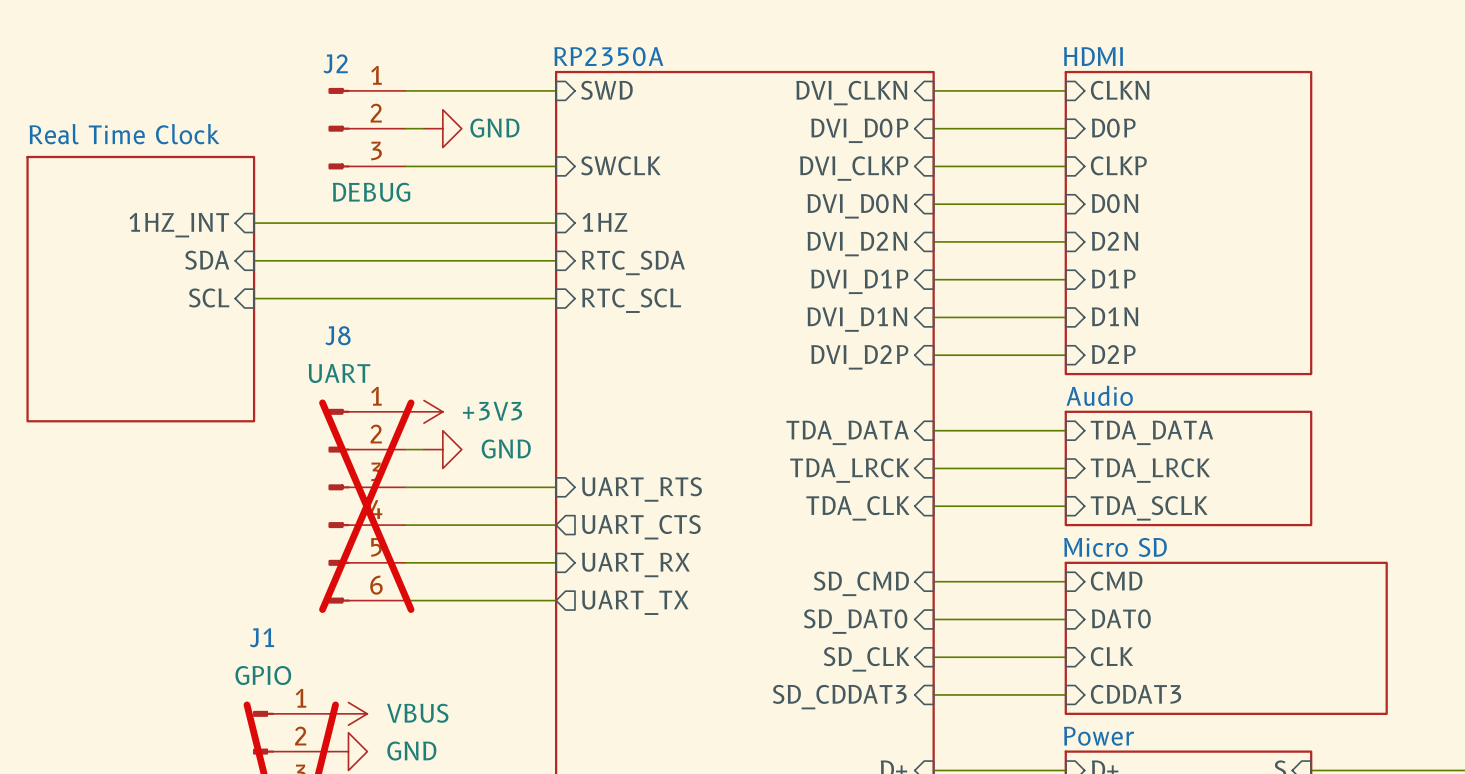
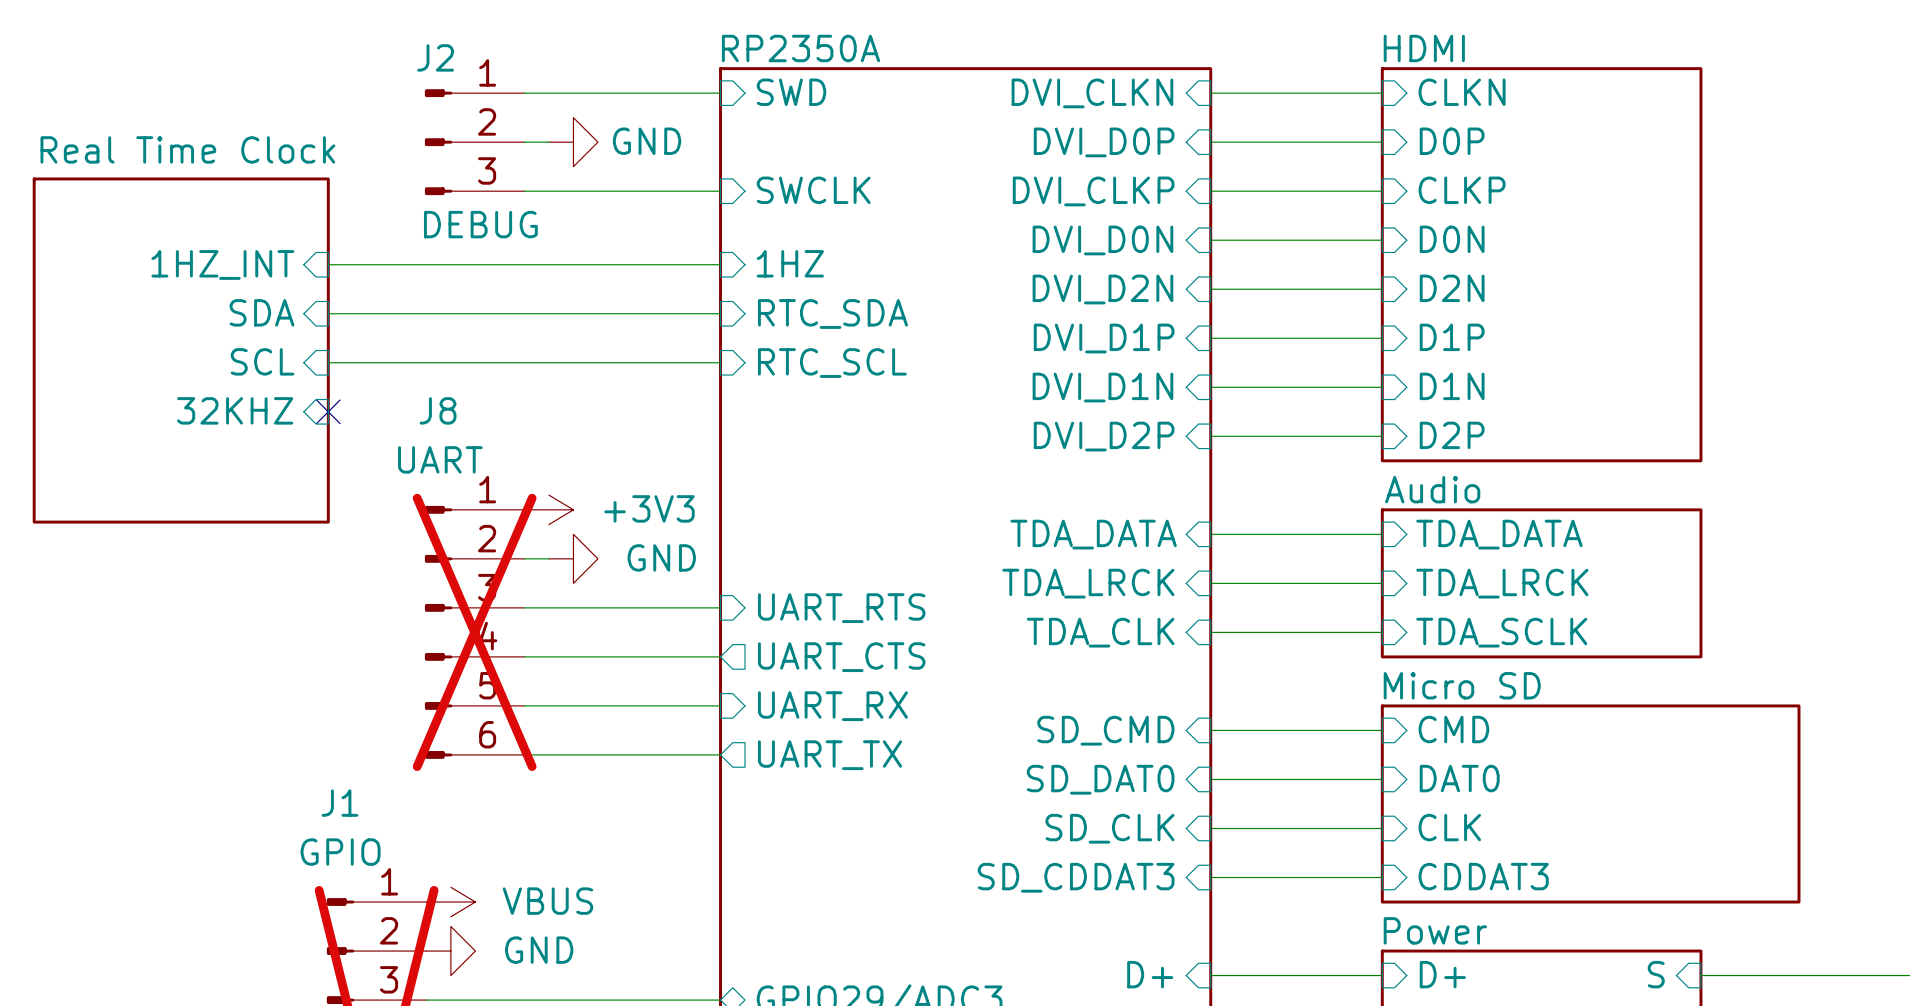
sheet pin: none -> 32KHZ (235, 410)
no-connect mark: none -> (328, 411)

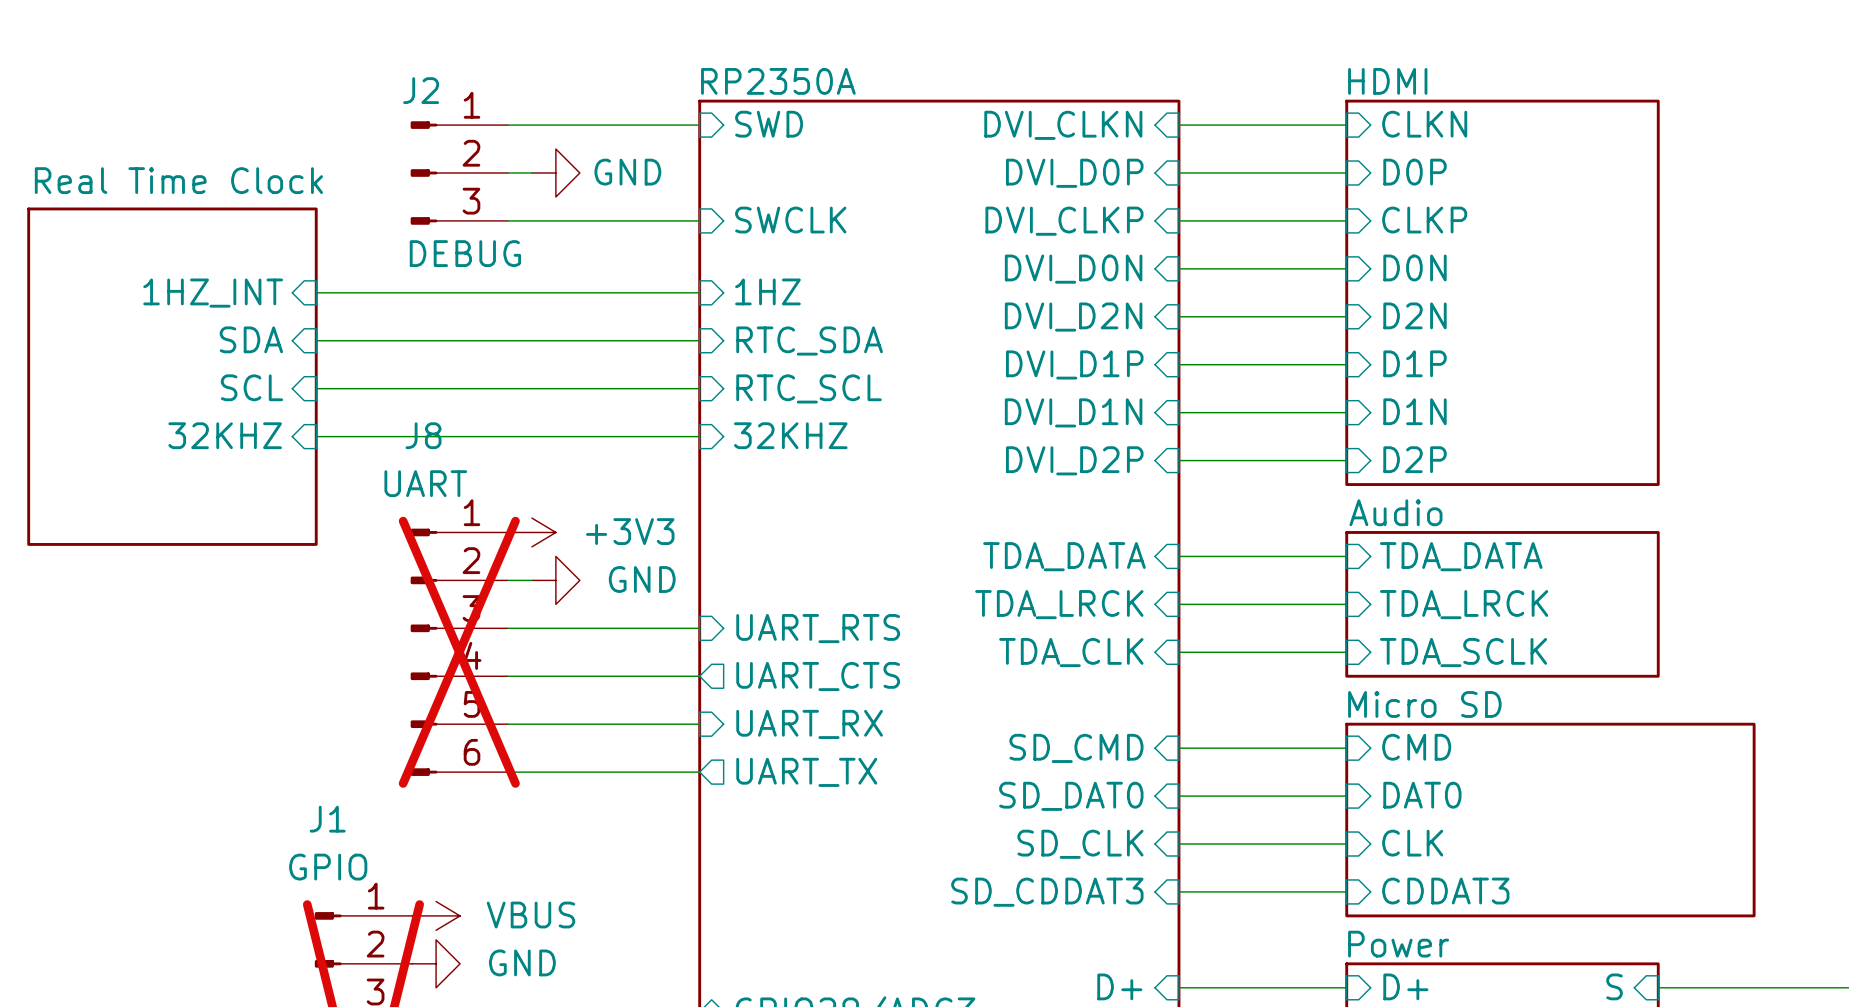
sheet pin: none -> 32KHZ (790, 435)
wire: none -> (316, 436) (699, 436)
no-connect mark: (328, 411) -> none

